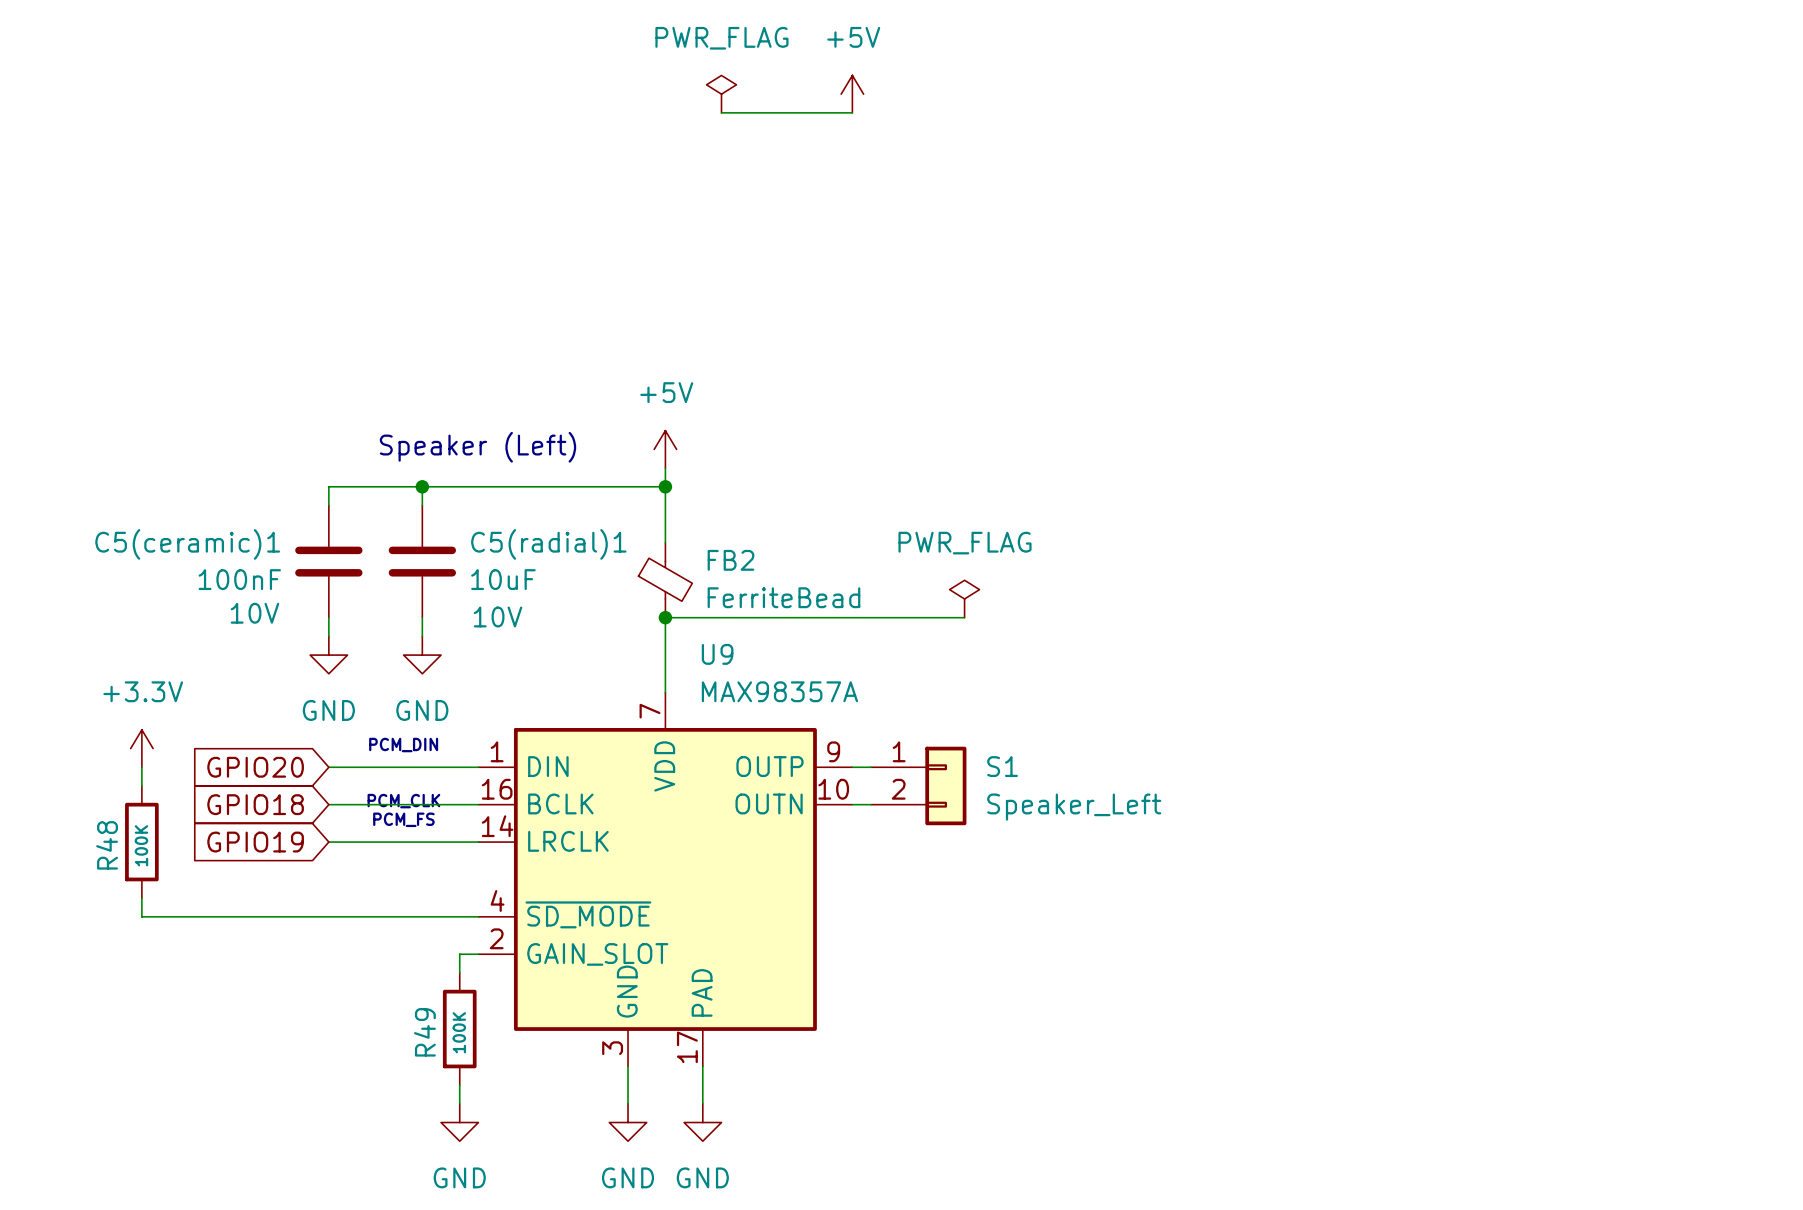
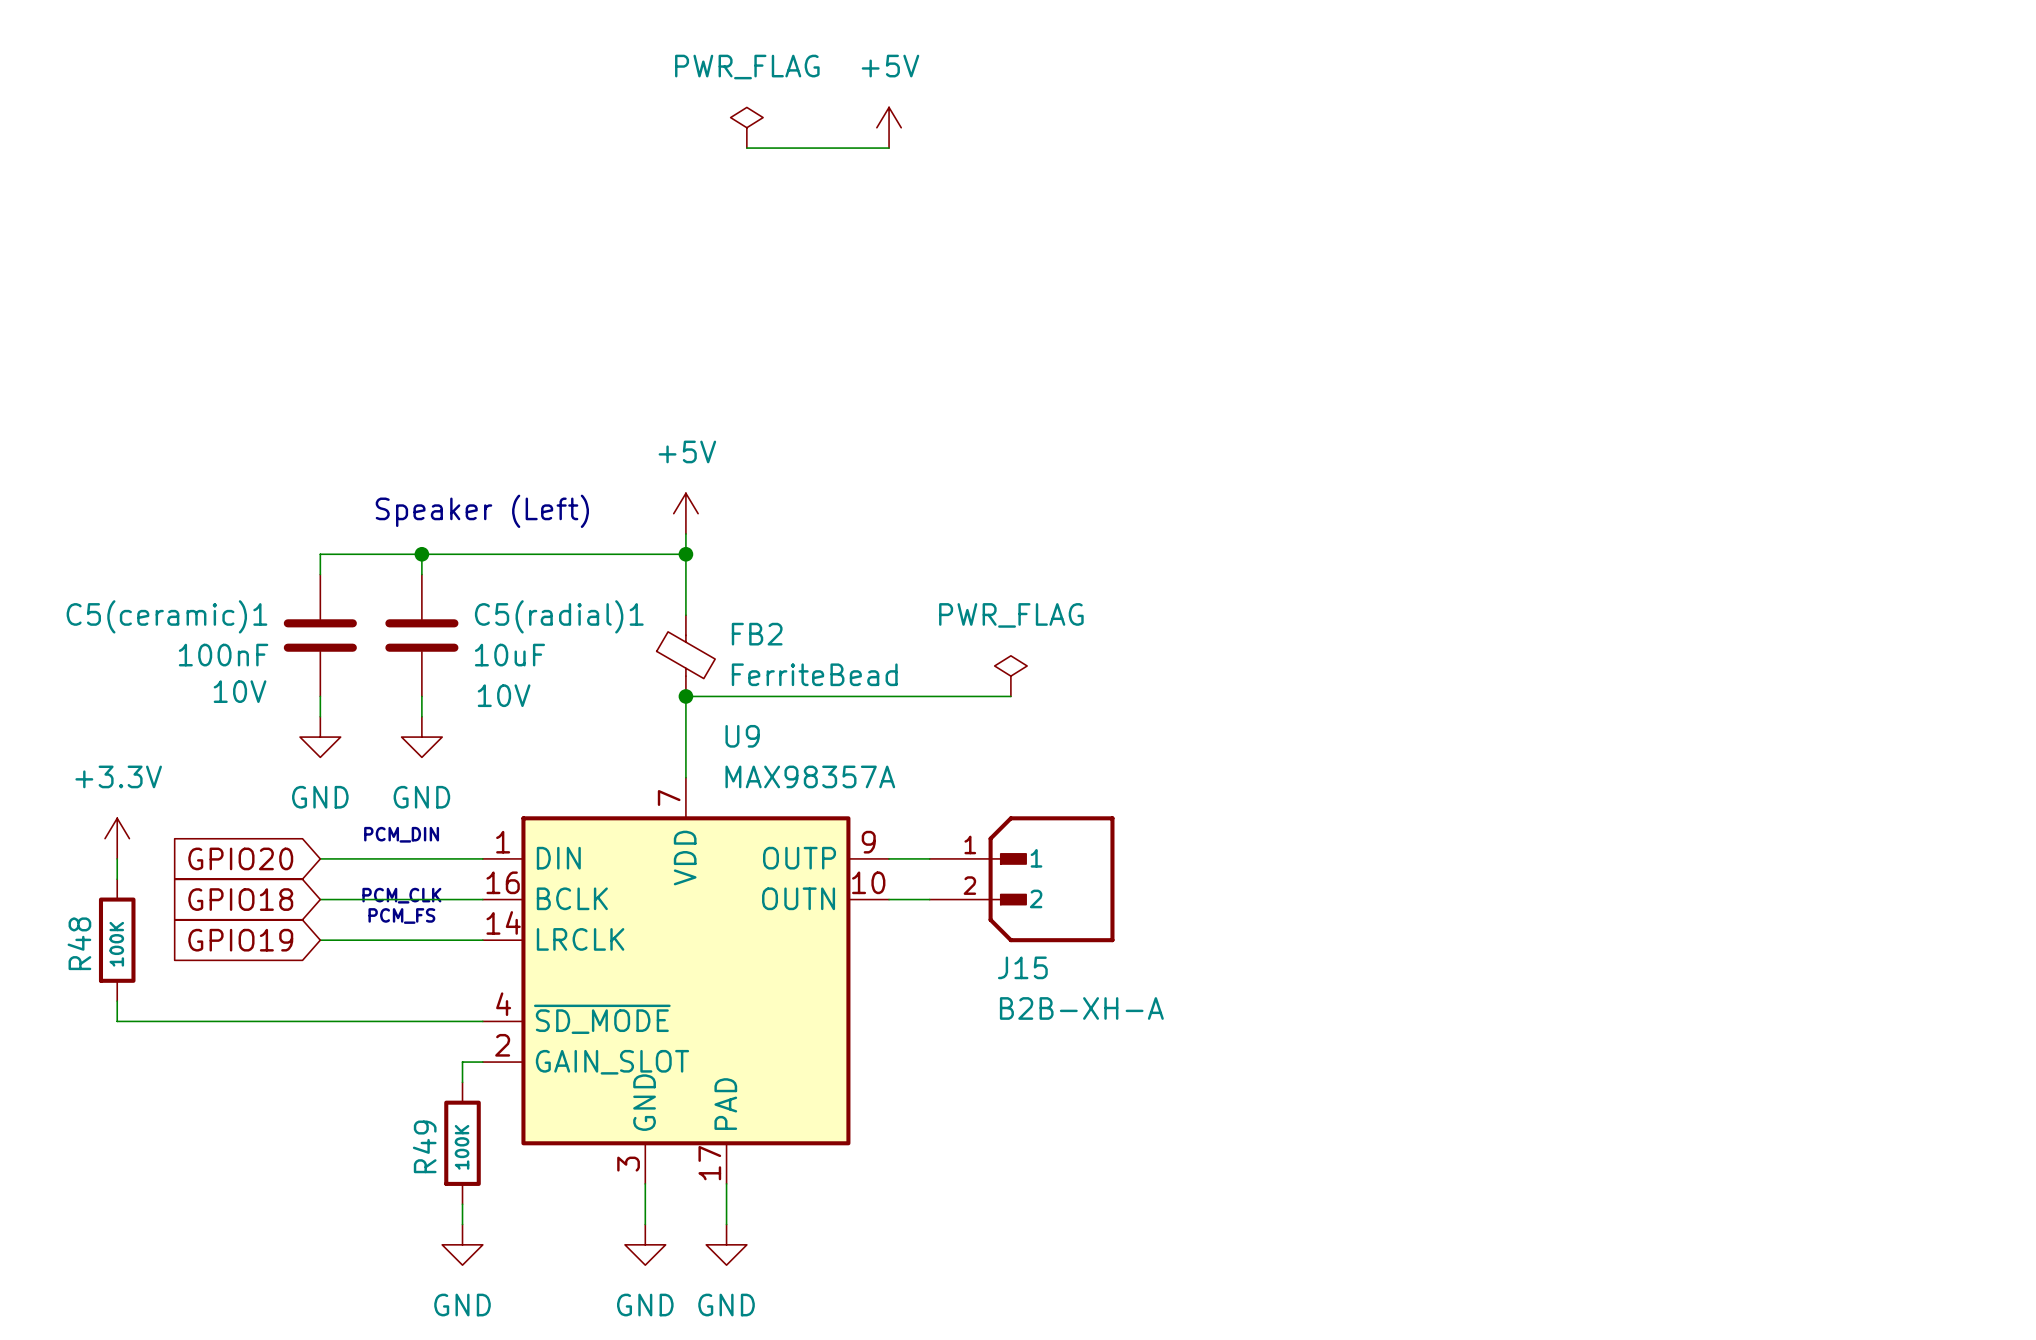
S1: Speaker_Left (918, 785) -> none
J15: none -> B2B-XH-A (1022, 879)

